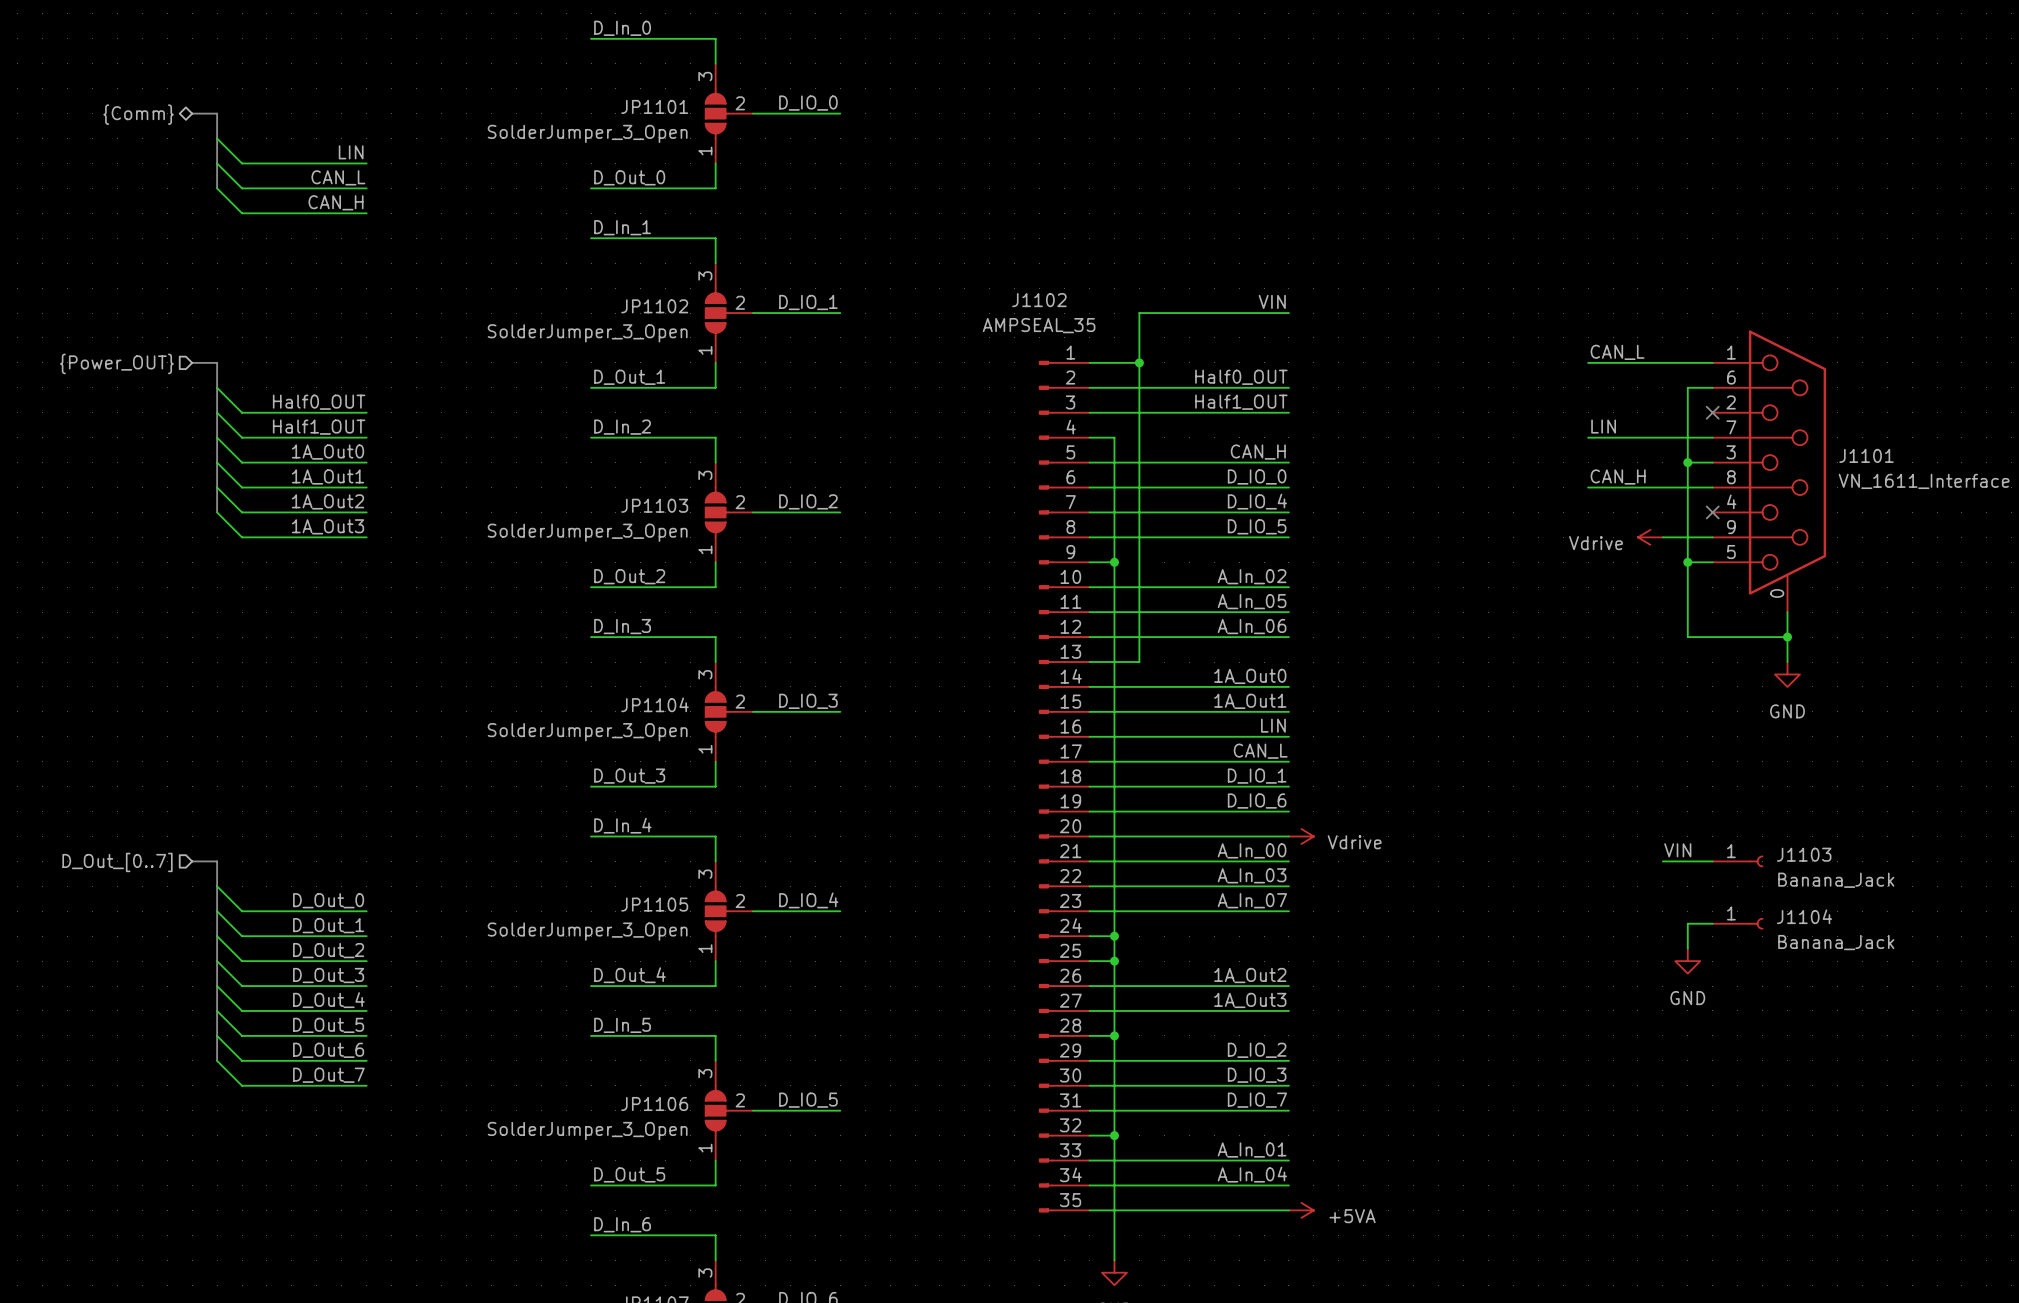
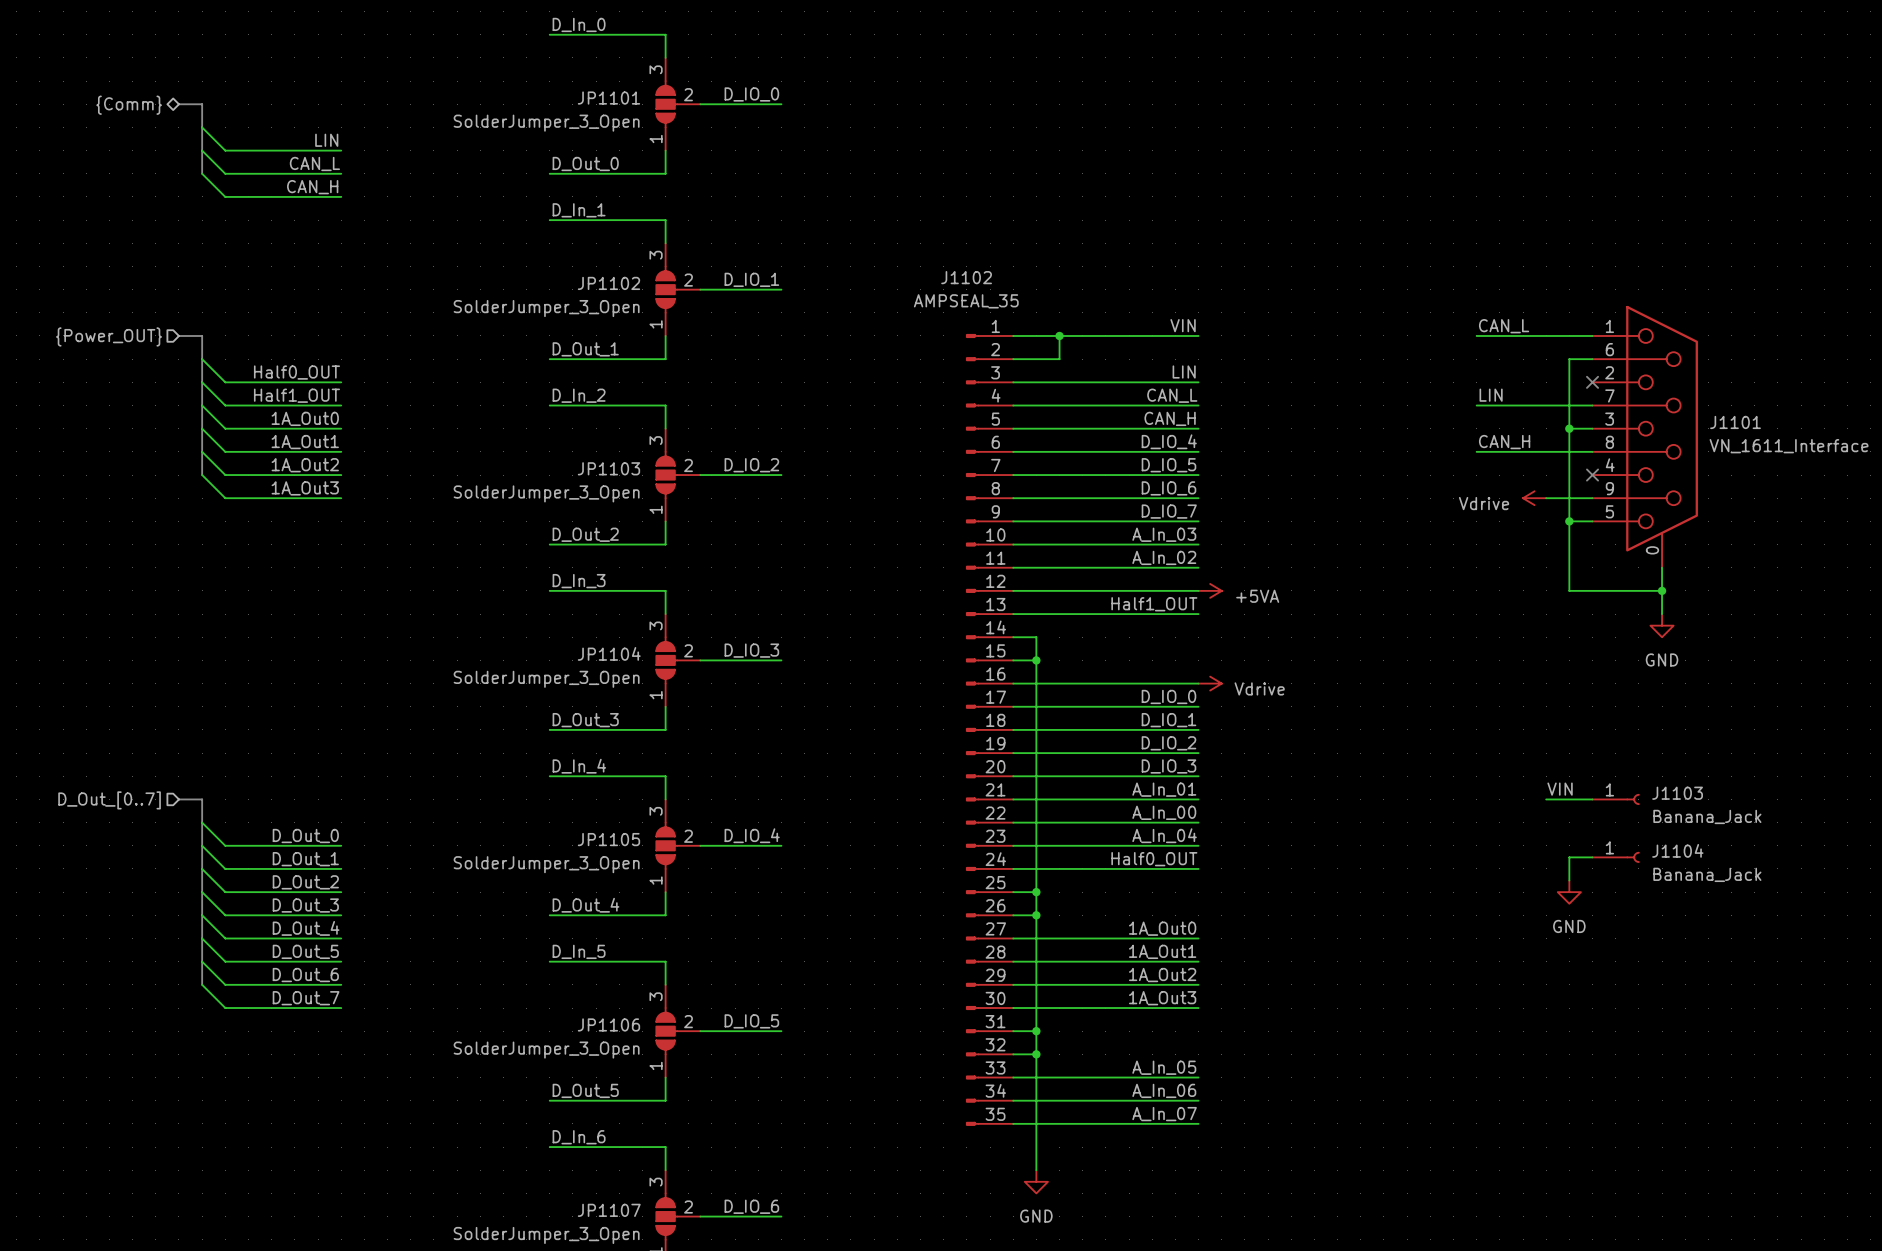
label position: VIN (1272, 301) -> VIN (1183, 325)
wire: (1288, 313) (1139, 313) (1139, 362) -> (1198, 335) (1059, 335)
label: Half0_OUT (1241, 377) -> none
wire: (1288, 387) (1139, 387) (1139, 662) -> (1198, 614) (1059, 614)
label: Half1_OUT (1241, 402) -> LIN (1184, 372)
label: none -> CAN_L (1172, 395)
wire: (1114, 437) (1114, 686) (1288, 686) -> (1036, 405) (1198, 405)
label: D_IO_0 (1257, 476) -> D_IO_4 (1169, 441)
label: D_IO_4 (1257, 501) -> D_IO_5 (1168, 465)
label: D_IO_5 (1257, 526) -> D_IO_6 (1168, 488)
label: none -> D_IO_7 (1169, 511)
junction: (1114, 562) -> none
label: A_In_02 (1252, 576) -> A_In_03 (1164, 534)
label: A_In_05 (1252, 601) -> A_In_02 (1164, 557)
label: A_In_06 (1252, 626) -> none
power symbol: none -> +5VA (1210, 590)
label: none -> Half1_OUT (1154, 604)
label: 1A_Out0 (1250, 676) -> none
label: 1A_Out1 (1250, 701) -> none
wire: (1114, 711) (1288, 711) -> (1036, 521) (1198, 521)
junction: none -> (1036, 660)
label: LIN (1273, 725) -> none
label: CAN_L (1260, 751) -> D_IO_0 (1168, 696)
label: D_IO_6 (1257, 801) -> D_IO_2 (1168, 743)
label: none -> D_IO_3 (1168, 766)
power symbol position: Vdrive (1301, 836) -> Vdrive (1210, 683)
label: A_In_00 (1252, 850) -> A_In_01 (1164, 789)
label: A_In_03 (1252, 875) -> A_In_00 (1164, 812)
label: A_In_07 (1252, 900) -> A_In_04 (1164, 835)
label: none -> Half0_OUT (1154, 859)
junction: (1114, 936) -> none
label: 1A_Out2 (1250, 975) -> none
wire: (1114, 986) (1288, 986) -> (1036, 868) (1198, 868)
junction: none -> (1036, 915)
label: 1A_Out3 (1250, 1000) -> 1A_Out0 (1162, 928)
label: none -> 1A_Out1 (1162, 951)
junction: (1114, 1035) -> none
label: D_IO_2 (1257, 1050) -> 1A_Out2 (1162, 975)
label: D_IO_3 (1257, 1075) -> 1A_Out3 (1162, 998)
label: D_IO_7 (1257, 1100) -> none
wire: (1114, 1110) (1288, 1110) -> (1036, 961) (1198, 961)
junction: none -> (1036, 1031)
label: A_In_01 (1252, 1150) -> A_In_05 (1164, 1067)
label: A_In_04 (1252, 1174) -> A_In_06 (1164, 1090)
label: none -> A_In_07 (1164, 1114)
power symbol: +5VA (1301, 1210) -> none

